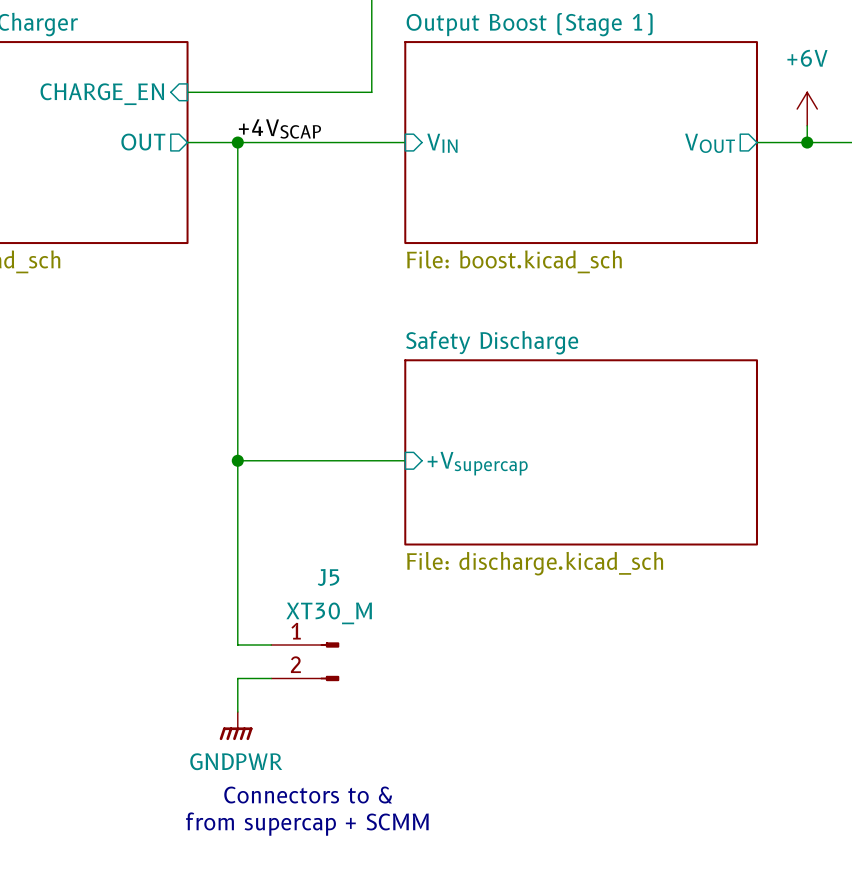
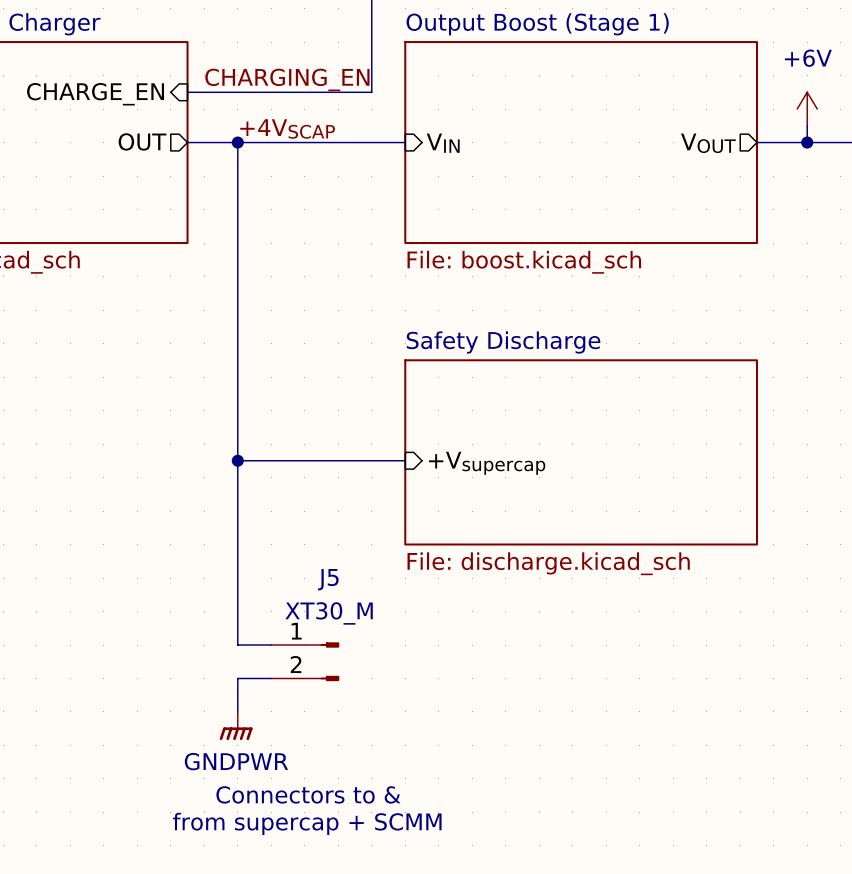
label: none -> CHARGING_EN (287, 79)

